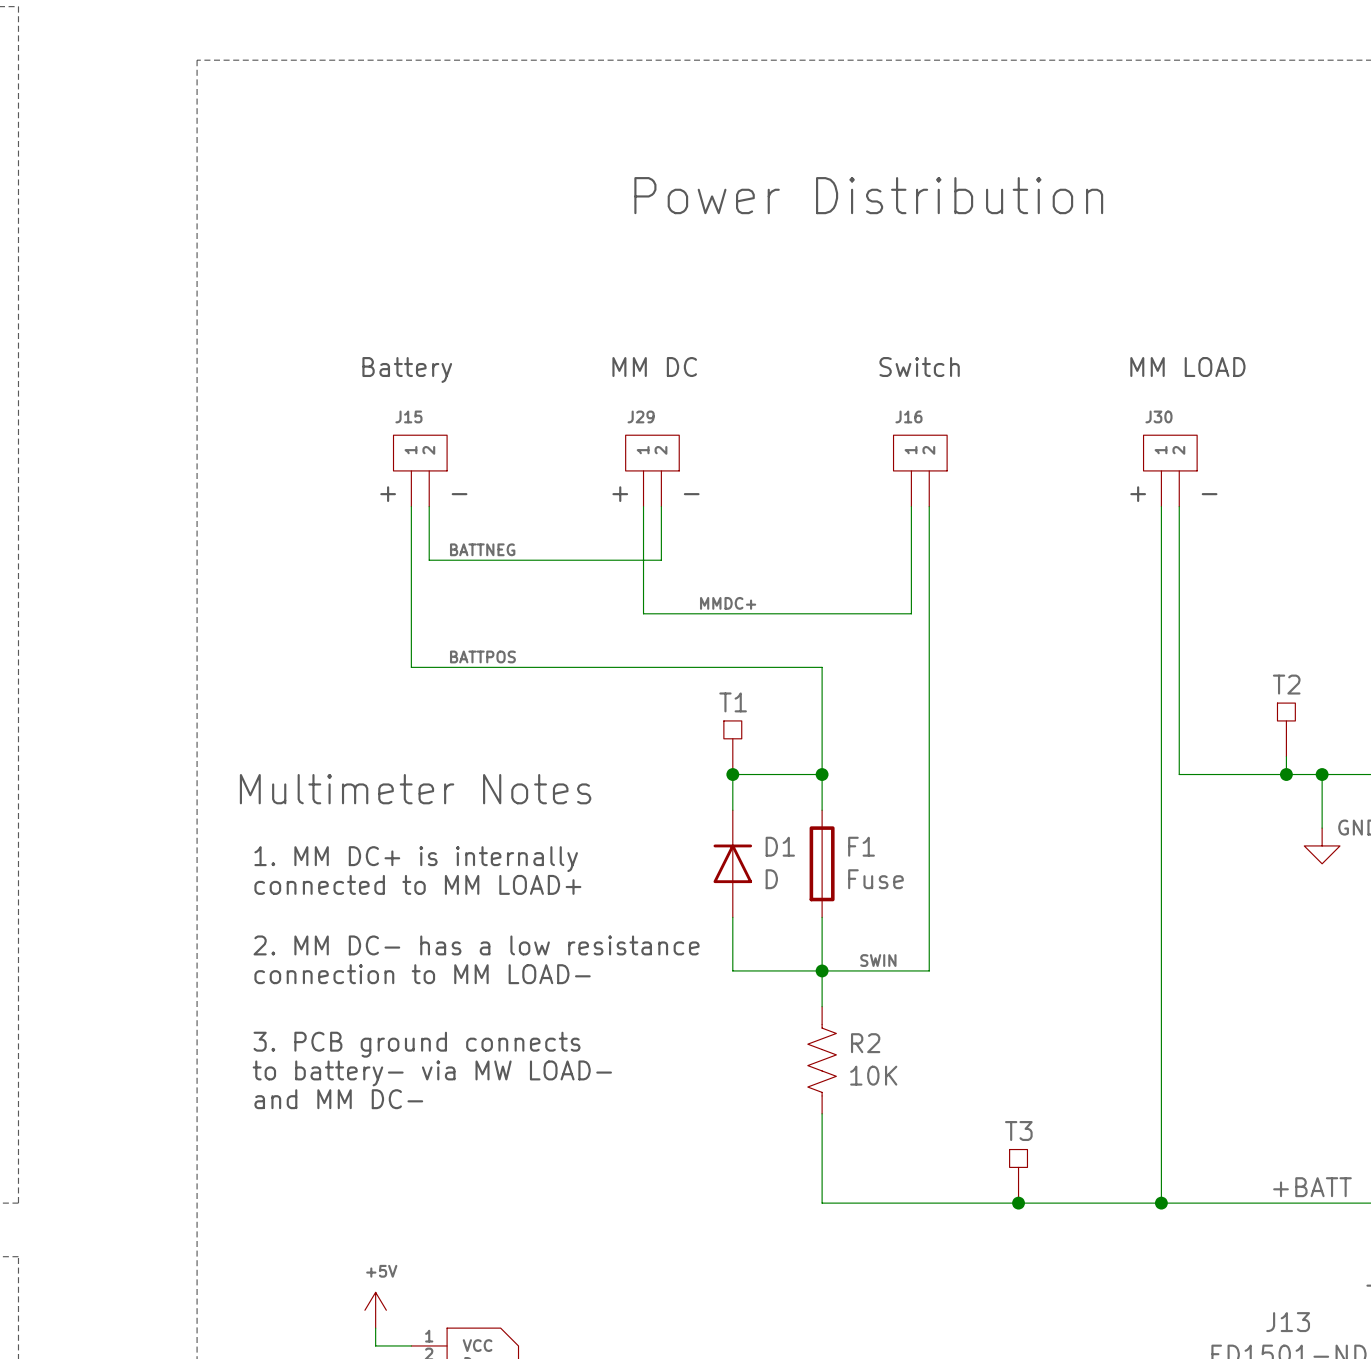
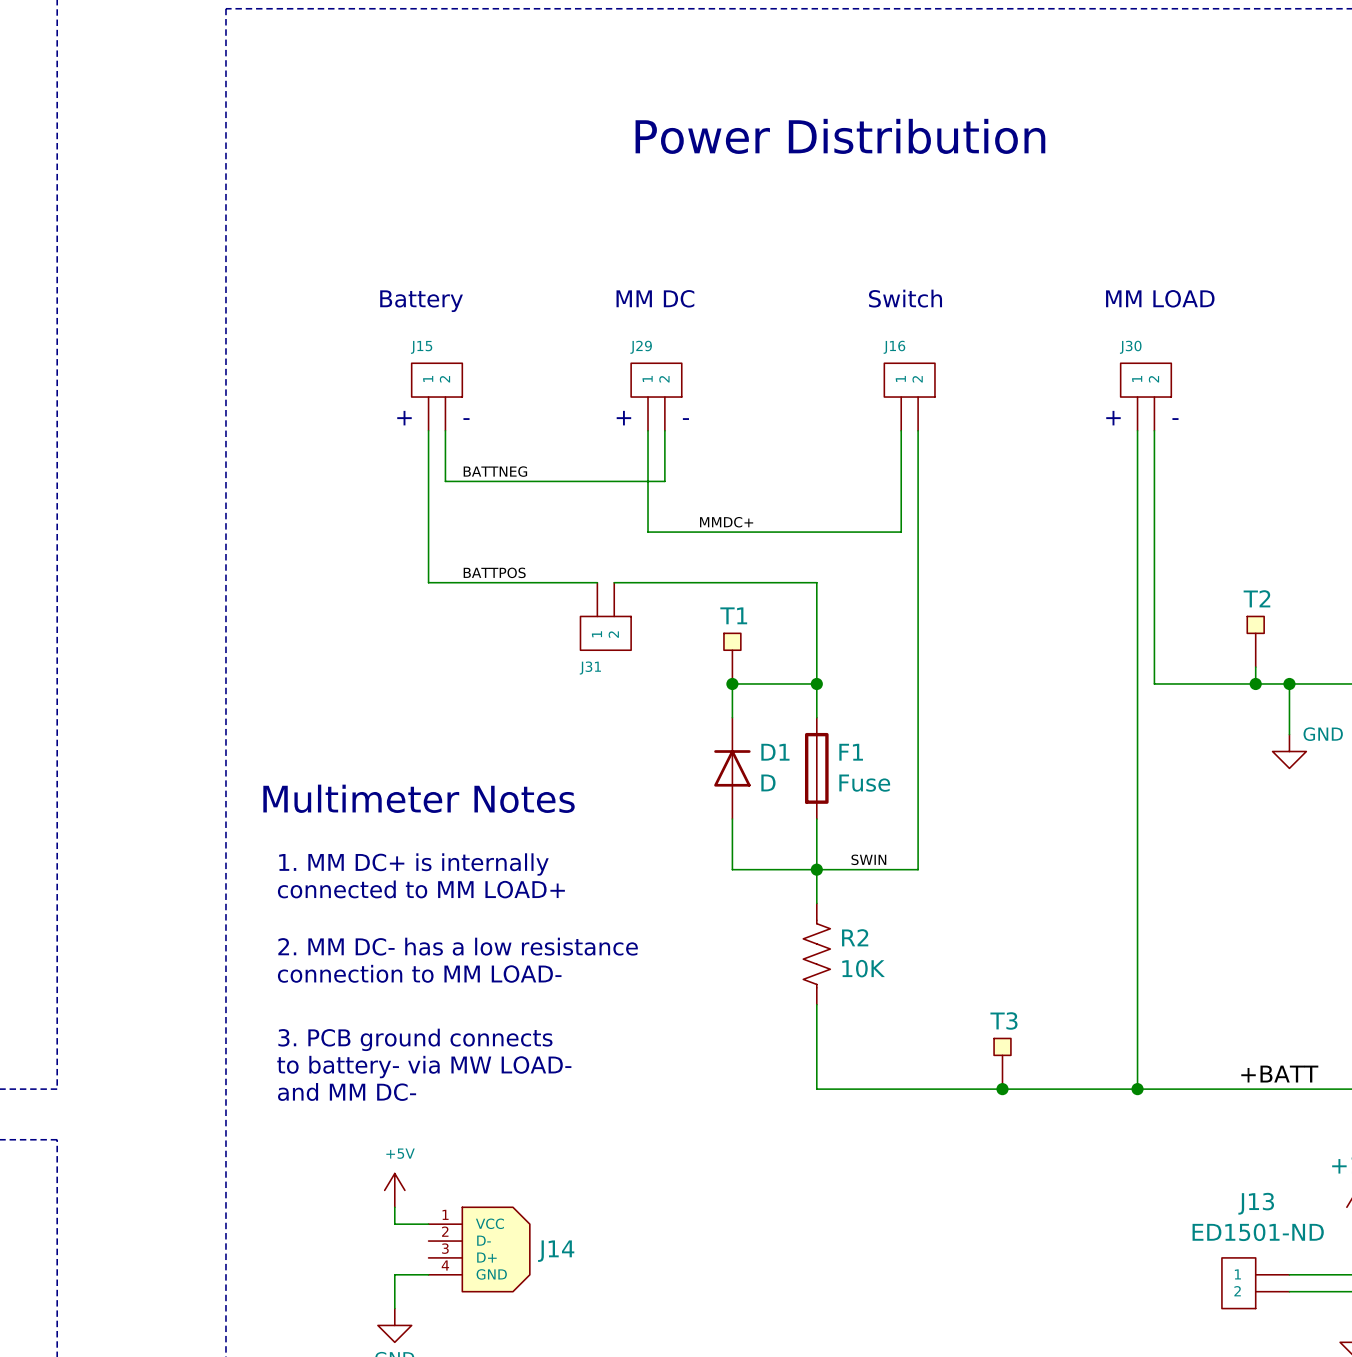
wire: (589, 667) (607, 667) -> none
J31: none -> (605, 616)
text position: Multimeter Notes (415, 789) -> Multimeter Notes (419, 798)
text position: 1. MM DC+ is internally (416, 859) -> 1. MM DC+ is internally (413, 864)
text position: connected to MM LOAD+ (417, 884) -> connected to MM LOAD+ (421, 889)
text position: 2. MM DC- has a low resistance (476, 945) -> 2. MM DC- has a low resistance (458, 946)
text position: connection to MM LOAD- (422, 974) -> connection to MM LOAD- (419, 973)
text position: 3. PCB ground connects (417, 1044) -> 3. PCB ground connects (415, 1039)
text position: to battery- via MW LOAD- (432, 1073) -> to battery- via MW LOAD- (424, 1067)
text position: and MM DC- (338, 1099) -> and MM DC- (347, 1091)

